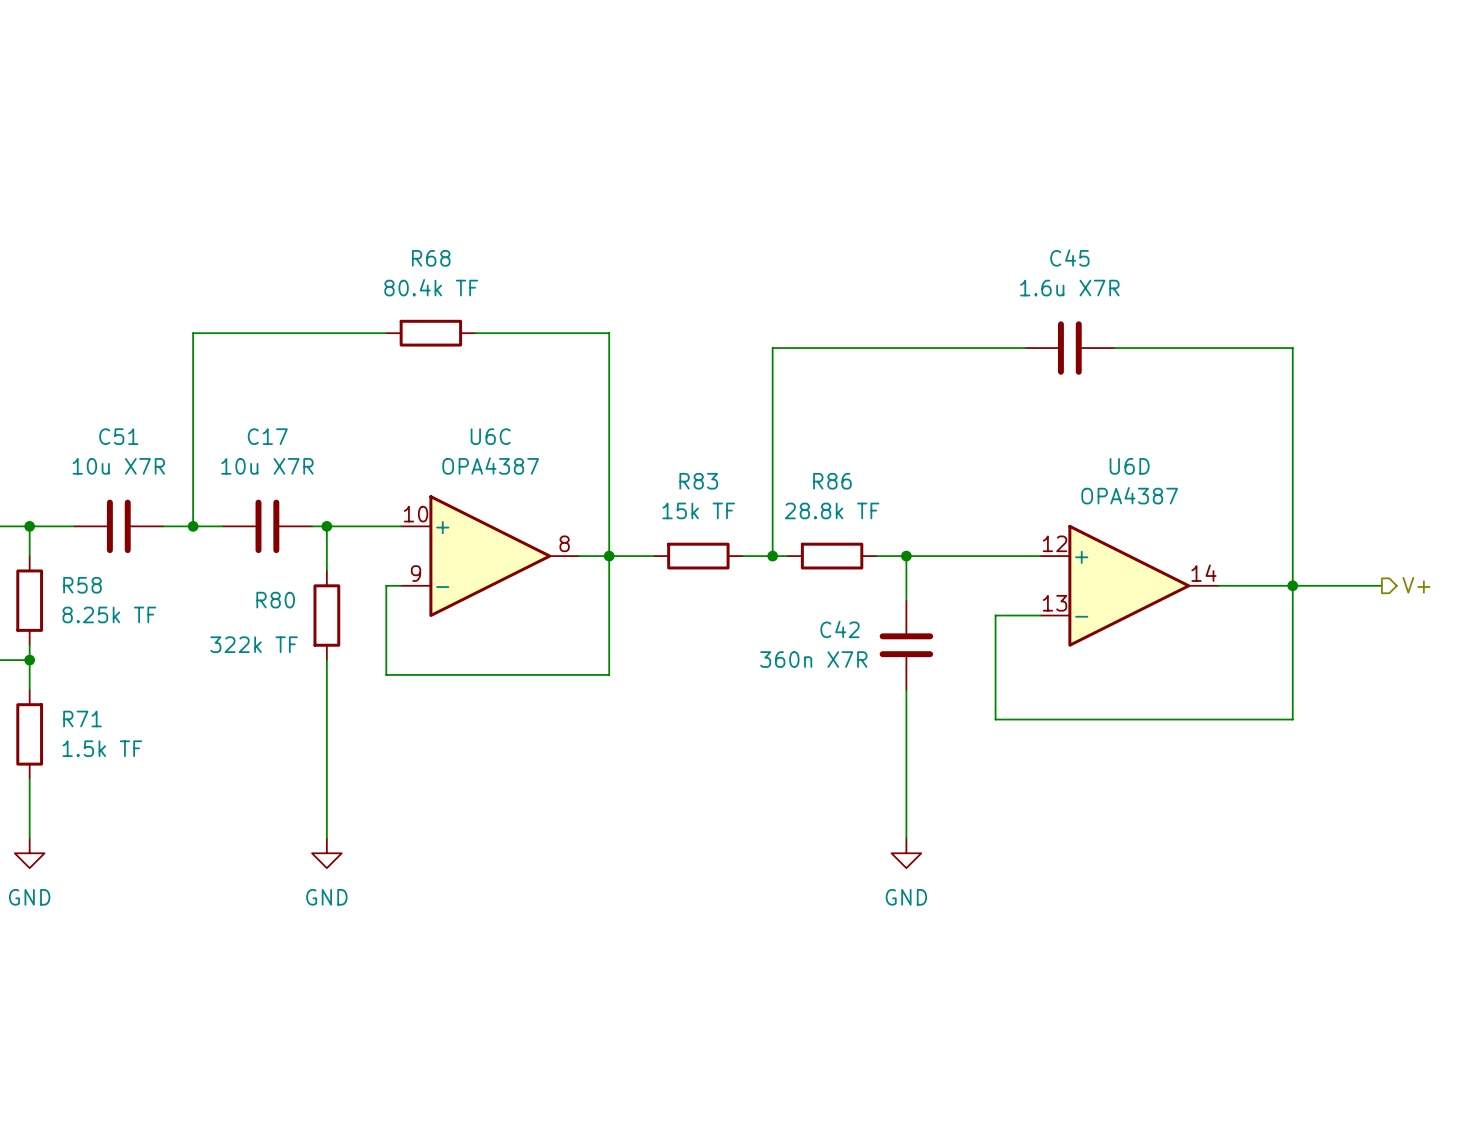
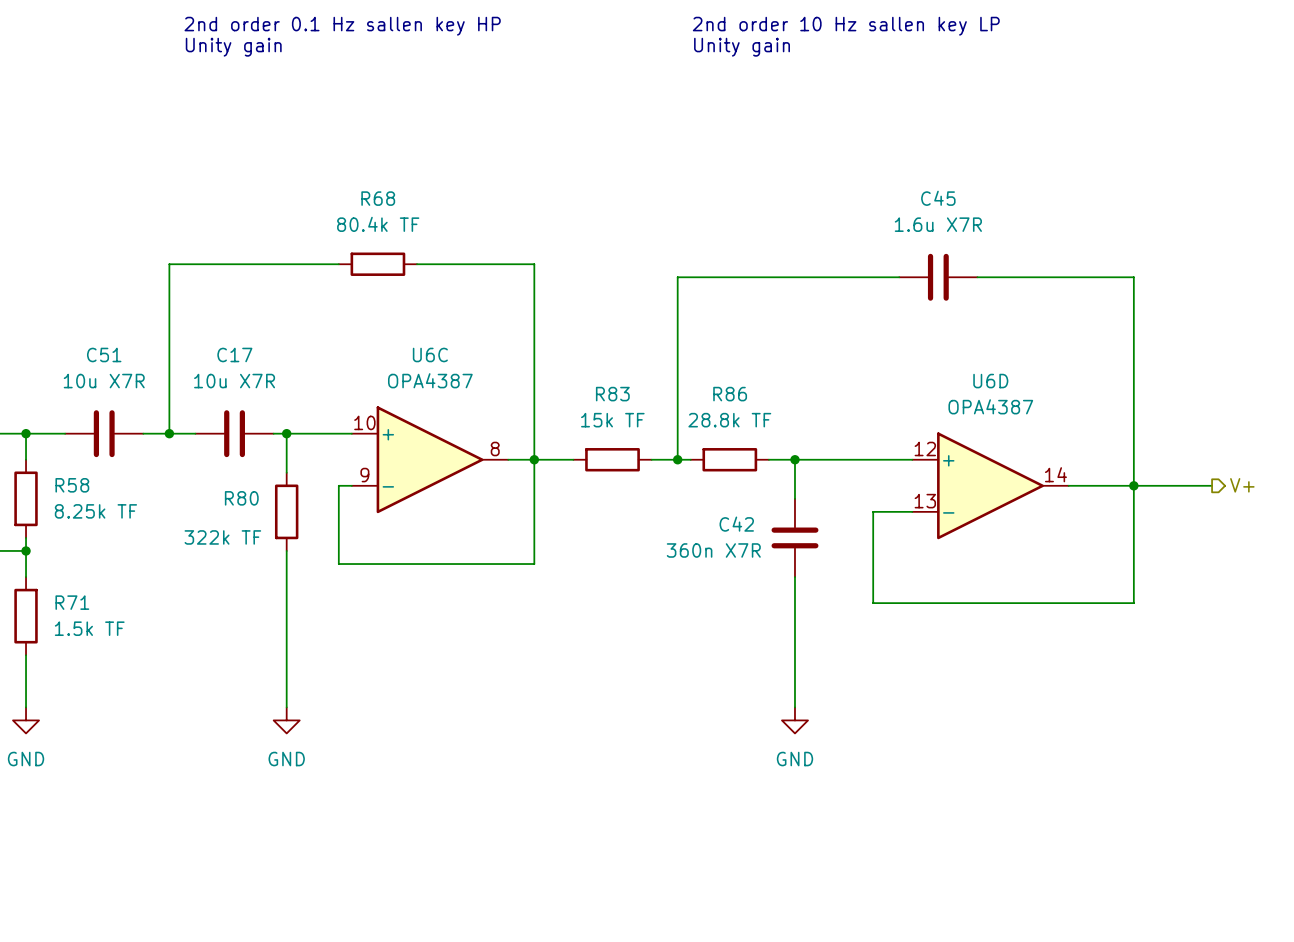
text: none -> 2nd order 0.1 Hz sallen key HP (342, 26)
text: none -> 2nd order 10 Hz sallen key LP (846, 26)
text: none -> Unity gain (233, 47)
text: none -> Unity gain (742, 47)

